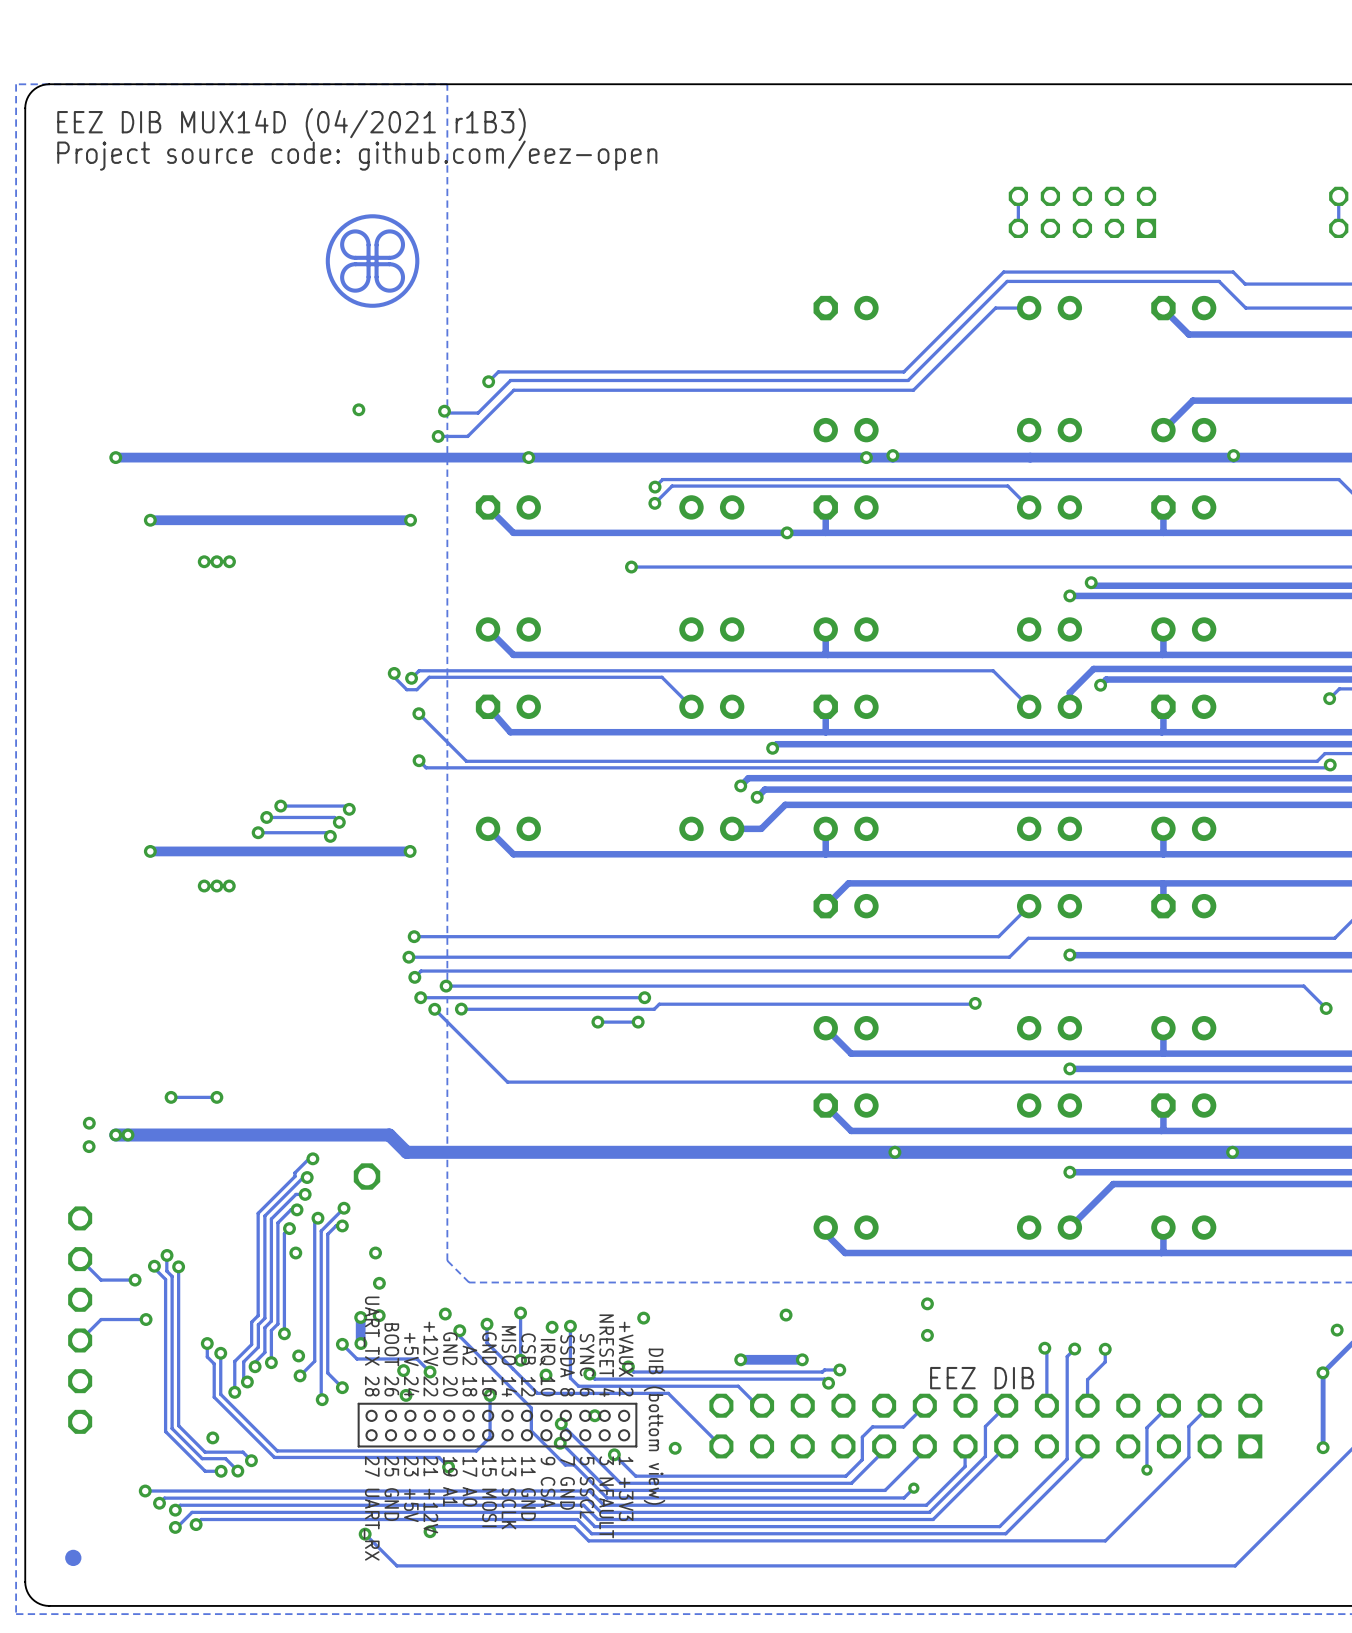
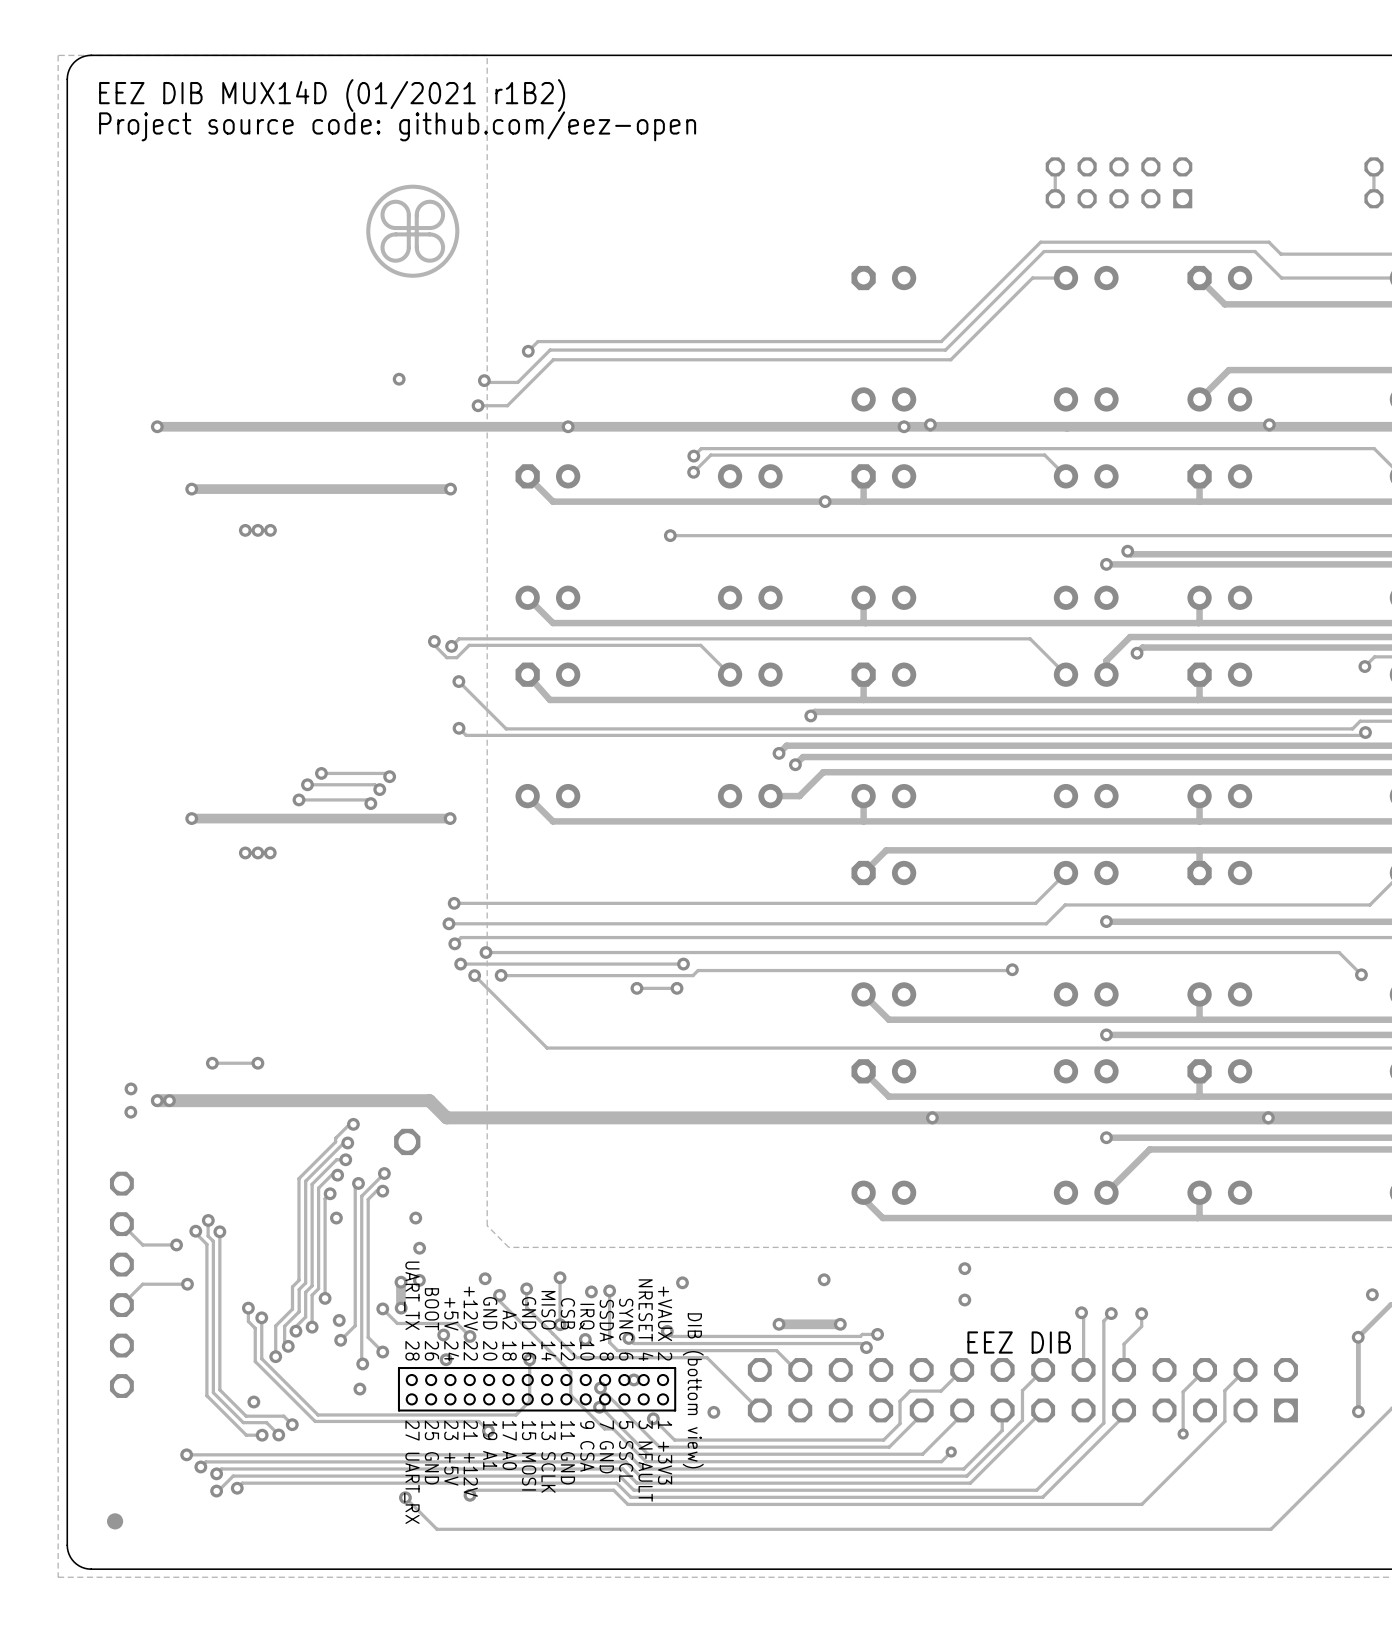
text: EEZ DIB MUX14D (04/2021 r1B3) (291, 124) -> EEZ DIB MUX14D (01/2021 r1B2) (332, 95)
via: none -> (359, 1389)

